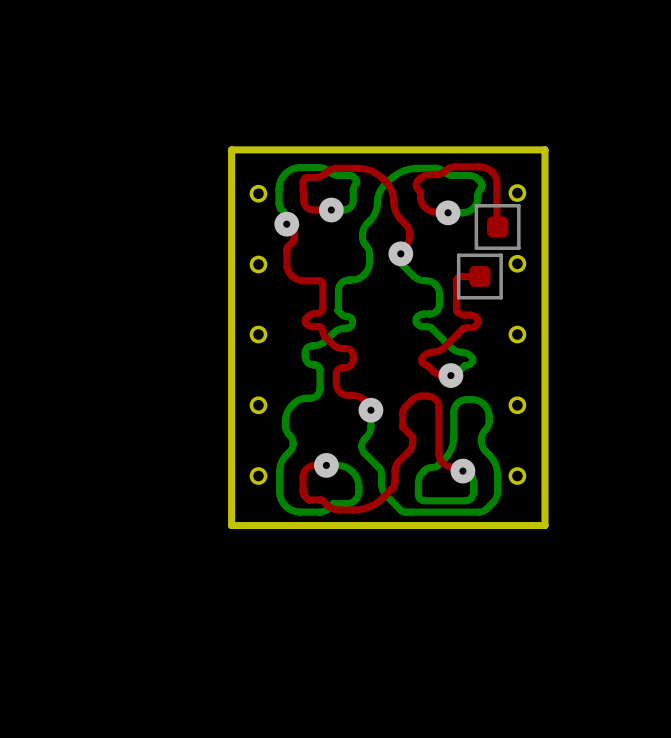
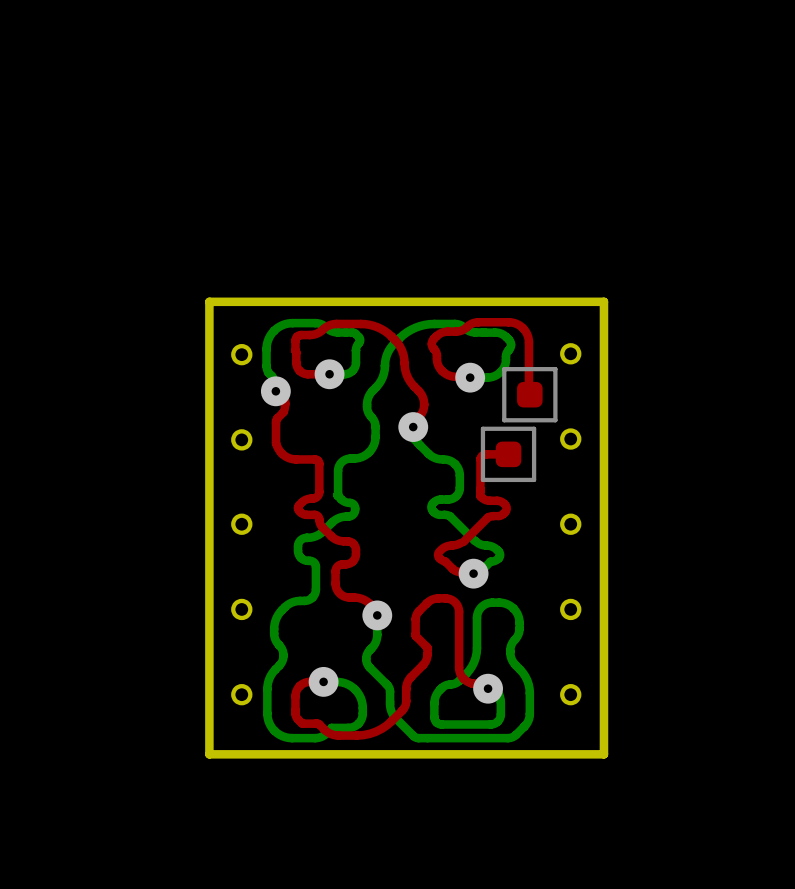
board edge: (545, 149) (545, 525) -> (586, 301) (603, 301) (603, 754) (586, 754)
round board edge position: (517, 193) -> (570, 353)
round board edge position: (517, 263) -> (570, 439)
round board edge position: (517, 334) -> (570, 524)
round board edge position: (517, 405) -> (570, 609)
round board edge position: (517, 476) -> (570, 694)

